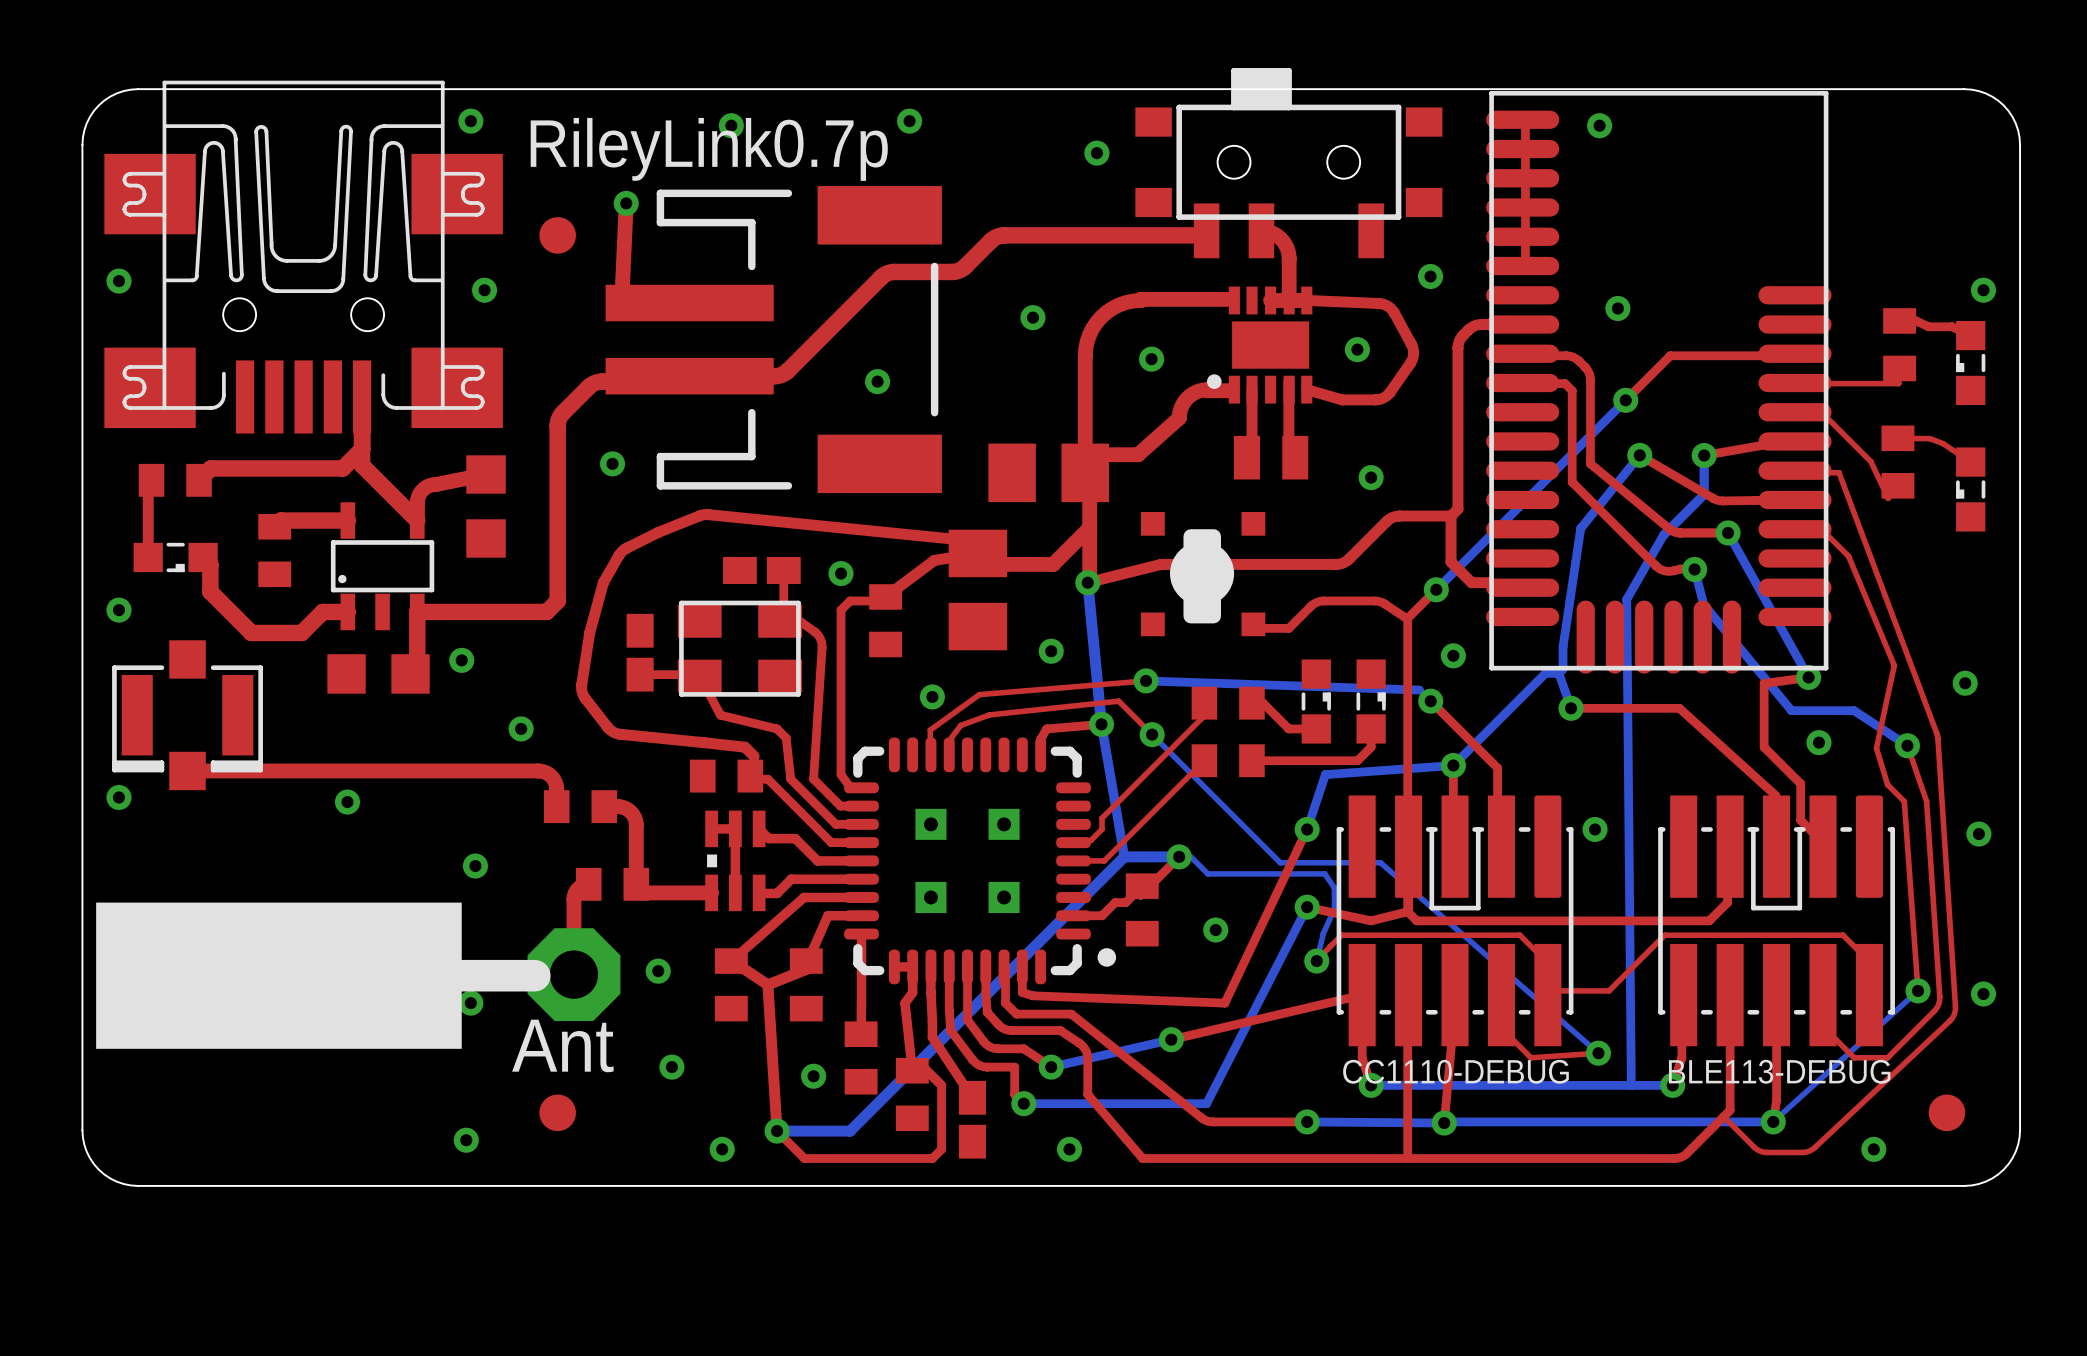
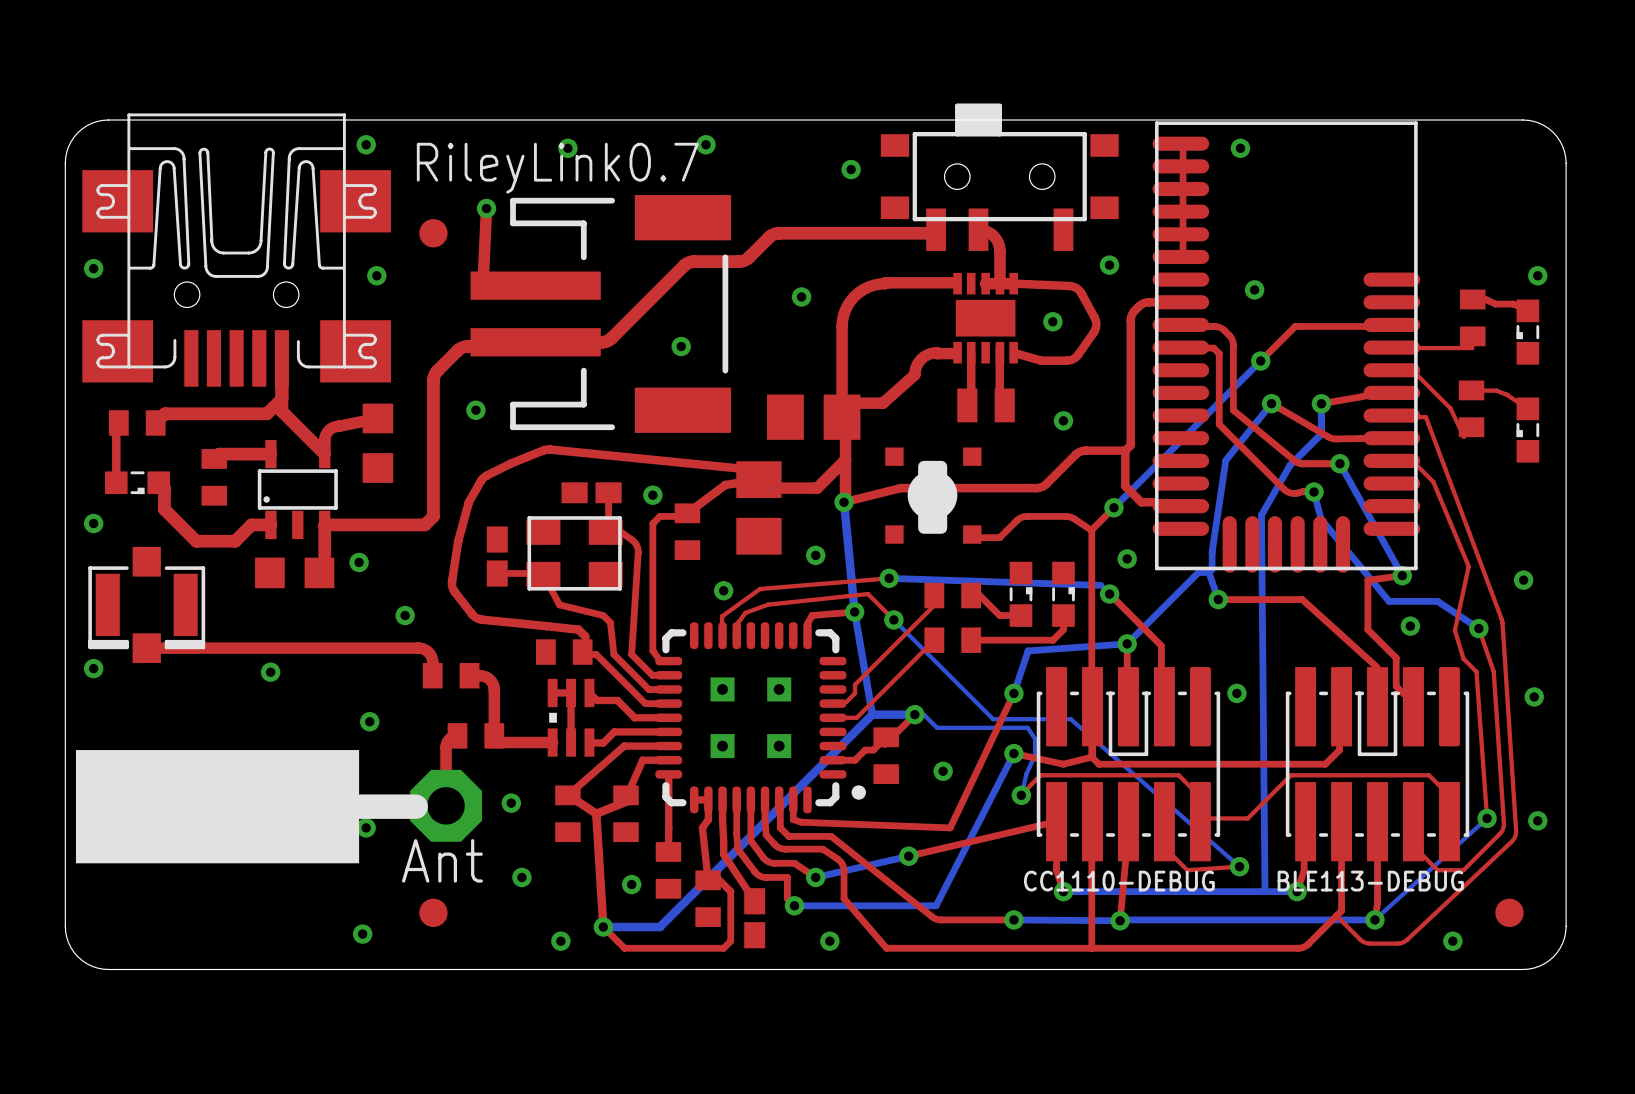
text: RileyLink0.7p (709, 149) -> RileyLink0.7 (557, 168)
part footprint: [1206, 286, 1313, 404] -> [953, 272, 1018, 364]
via: (1151, 359) -> none

